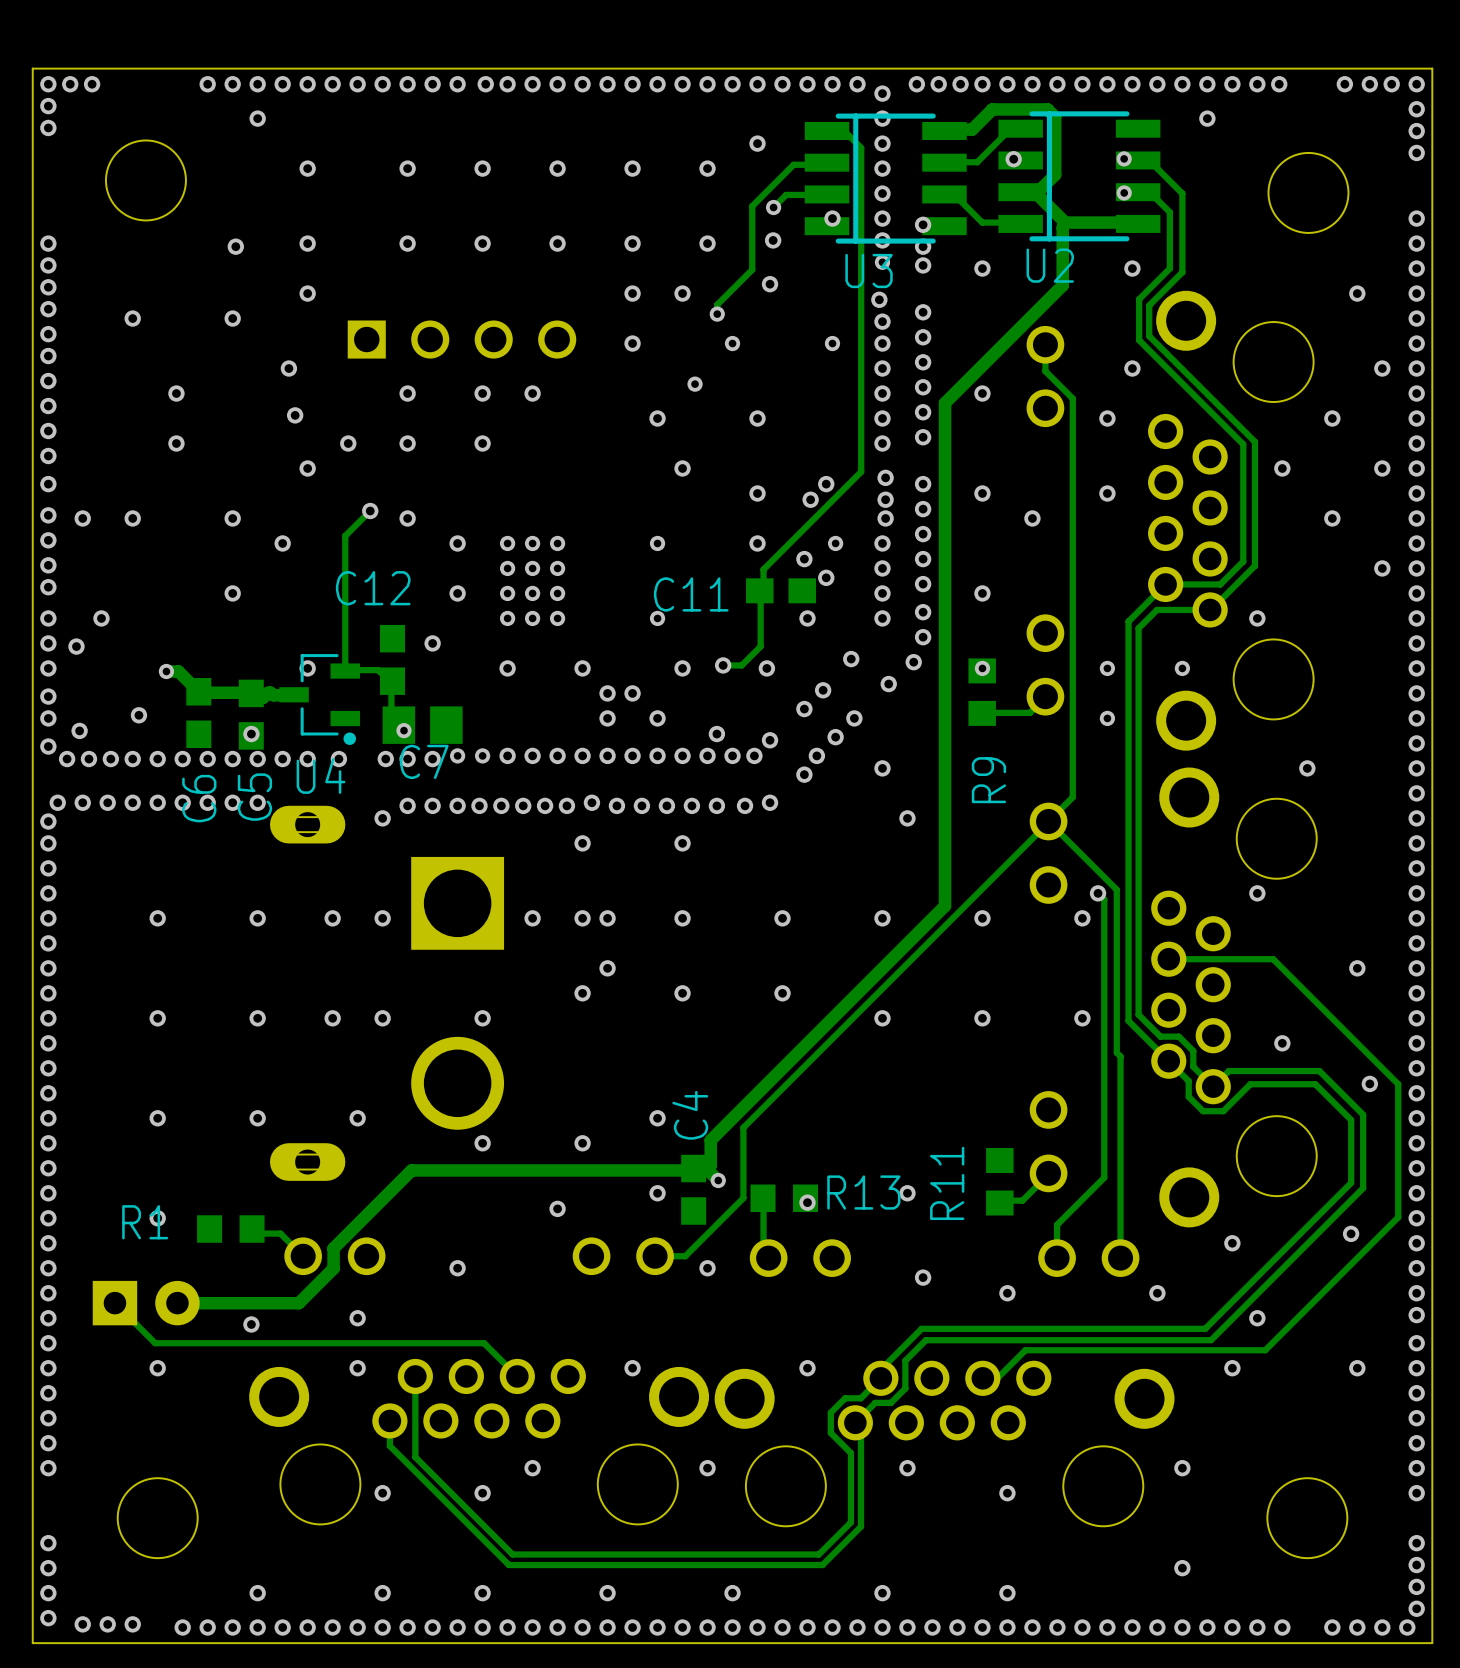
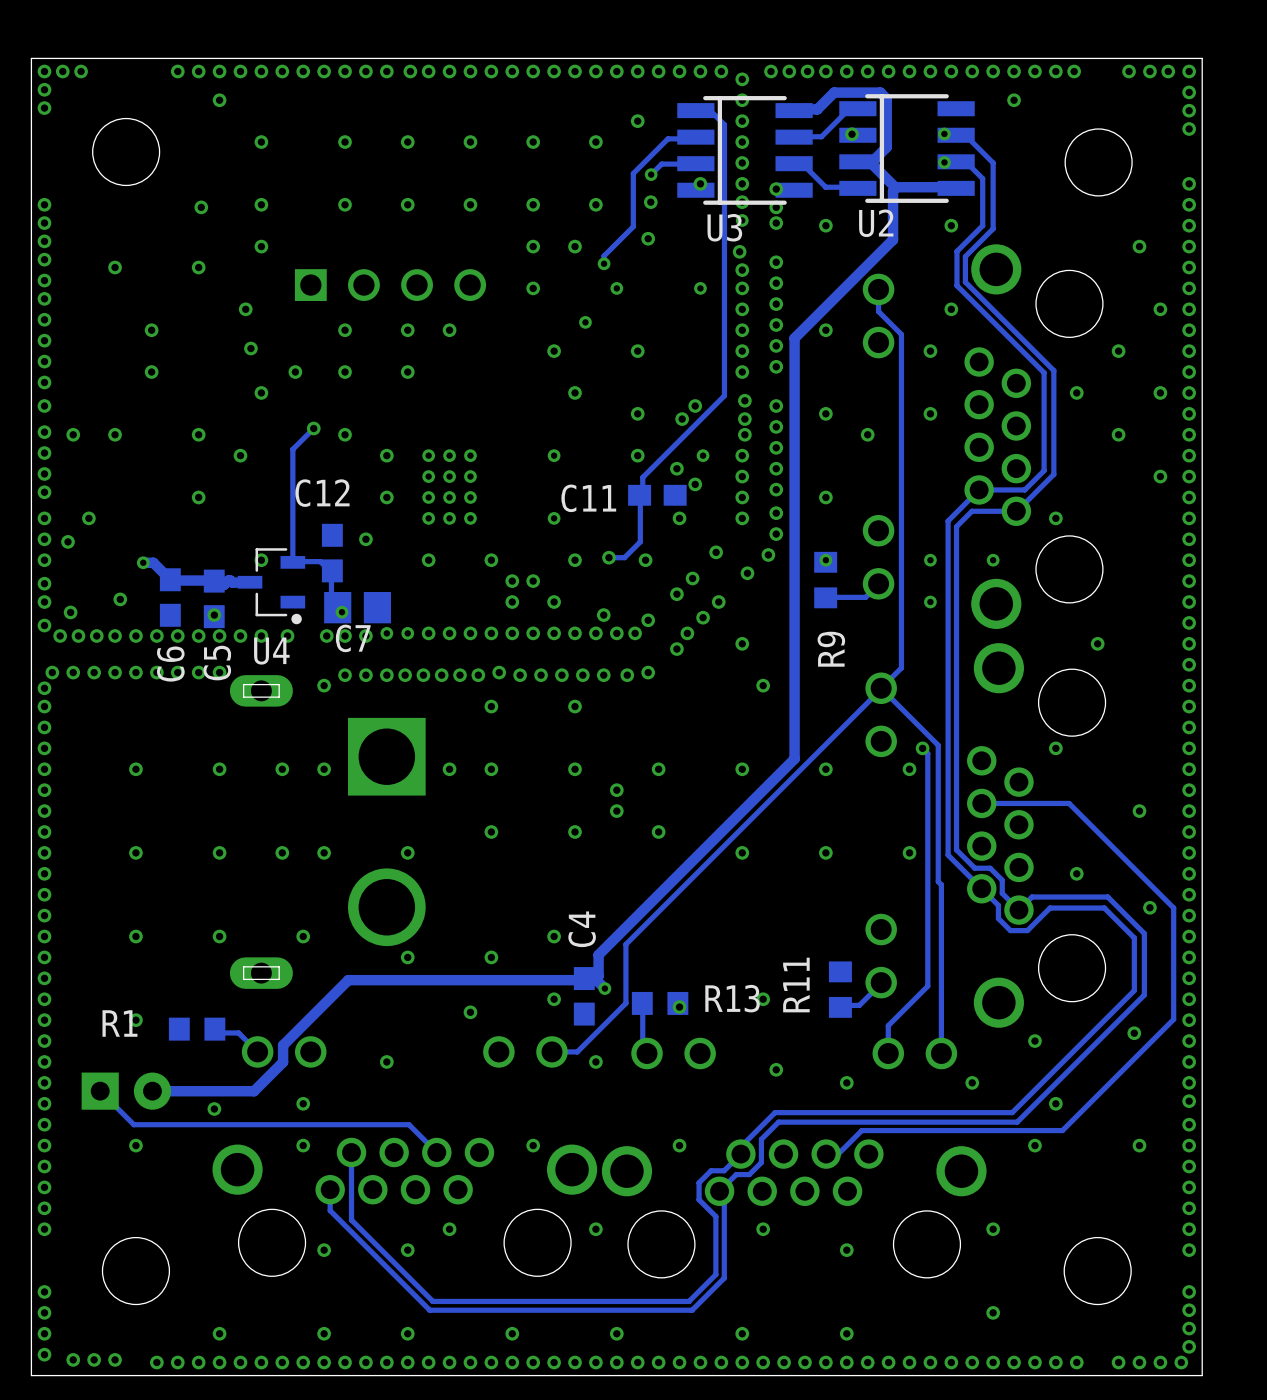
via: (607, 918) -> none
via: none -> (616, 790)
via: (607, 968) -> none
via: none -> (616, 811)

